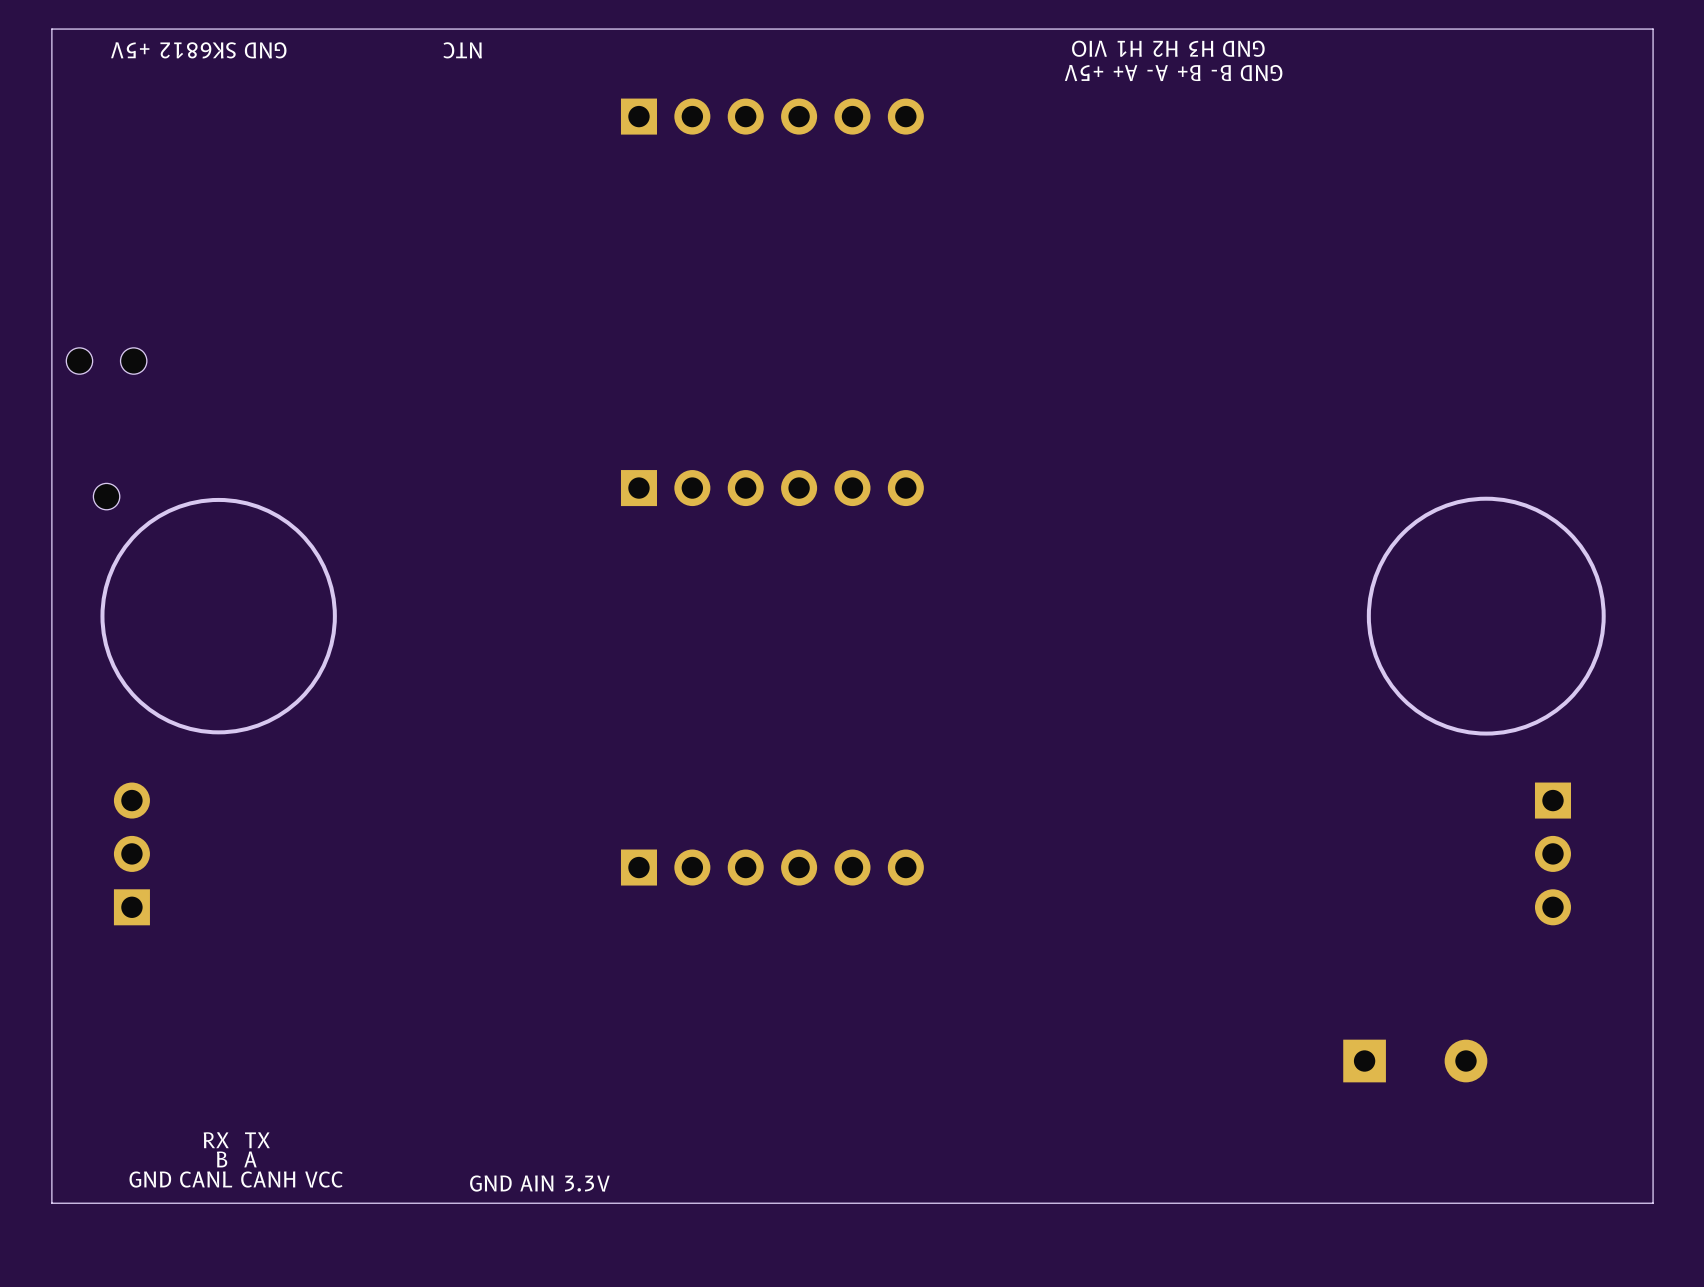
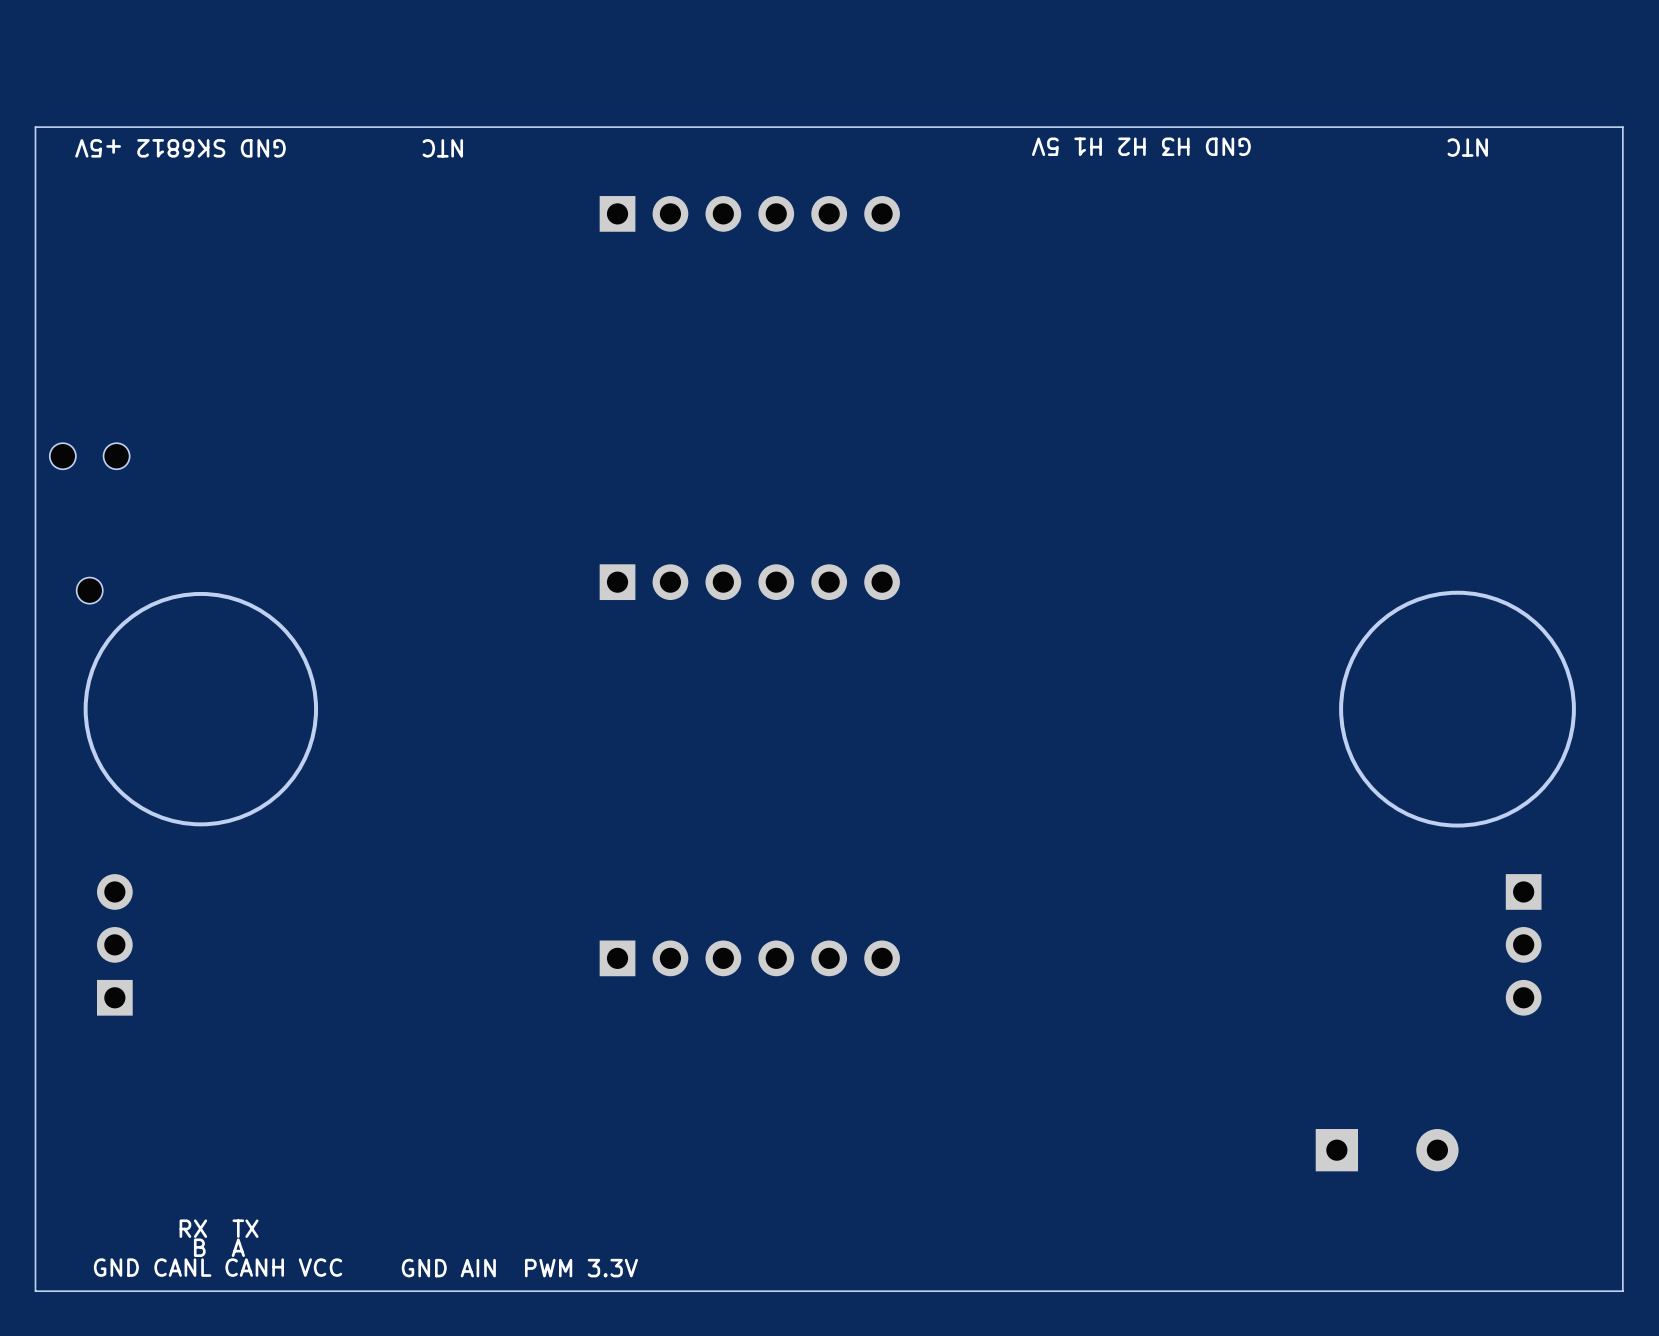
text: GND H3 H2 H1 VIO (1168, 48) -> GND H3 H2 H1 5V (1141, 146)
text: none -> NTC (1467, 147)
text: GND B- B+ A- A+ +5V (1173, 73) -> none
text: GND AIN 3.3V (539, 1183) -> GND AIN PWM 3.3V (519, 1268)

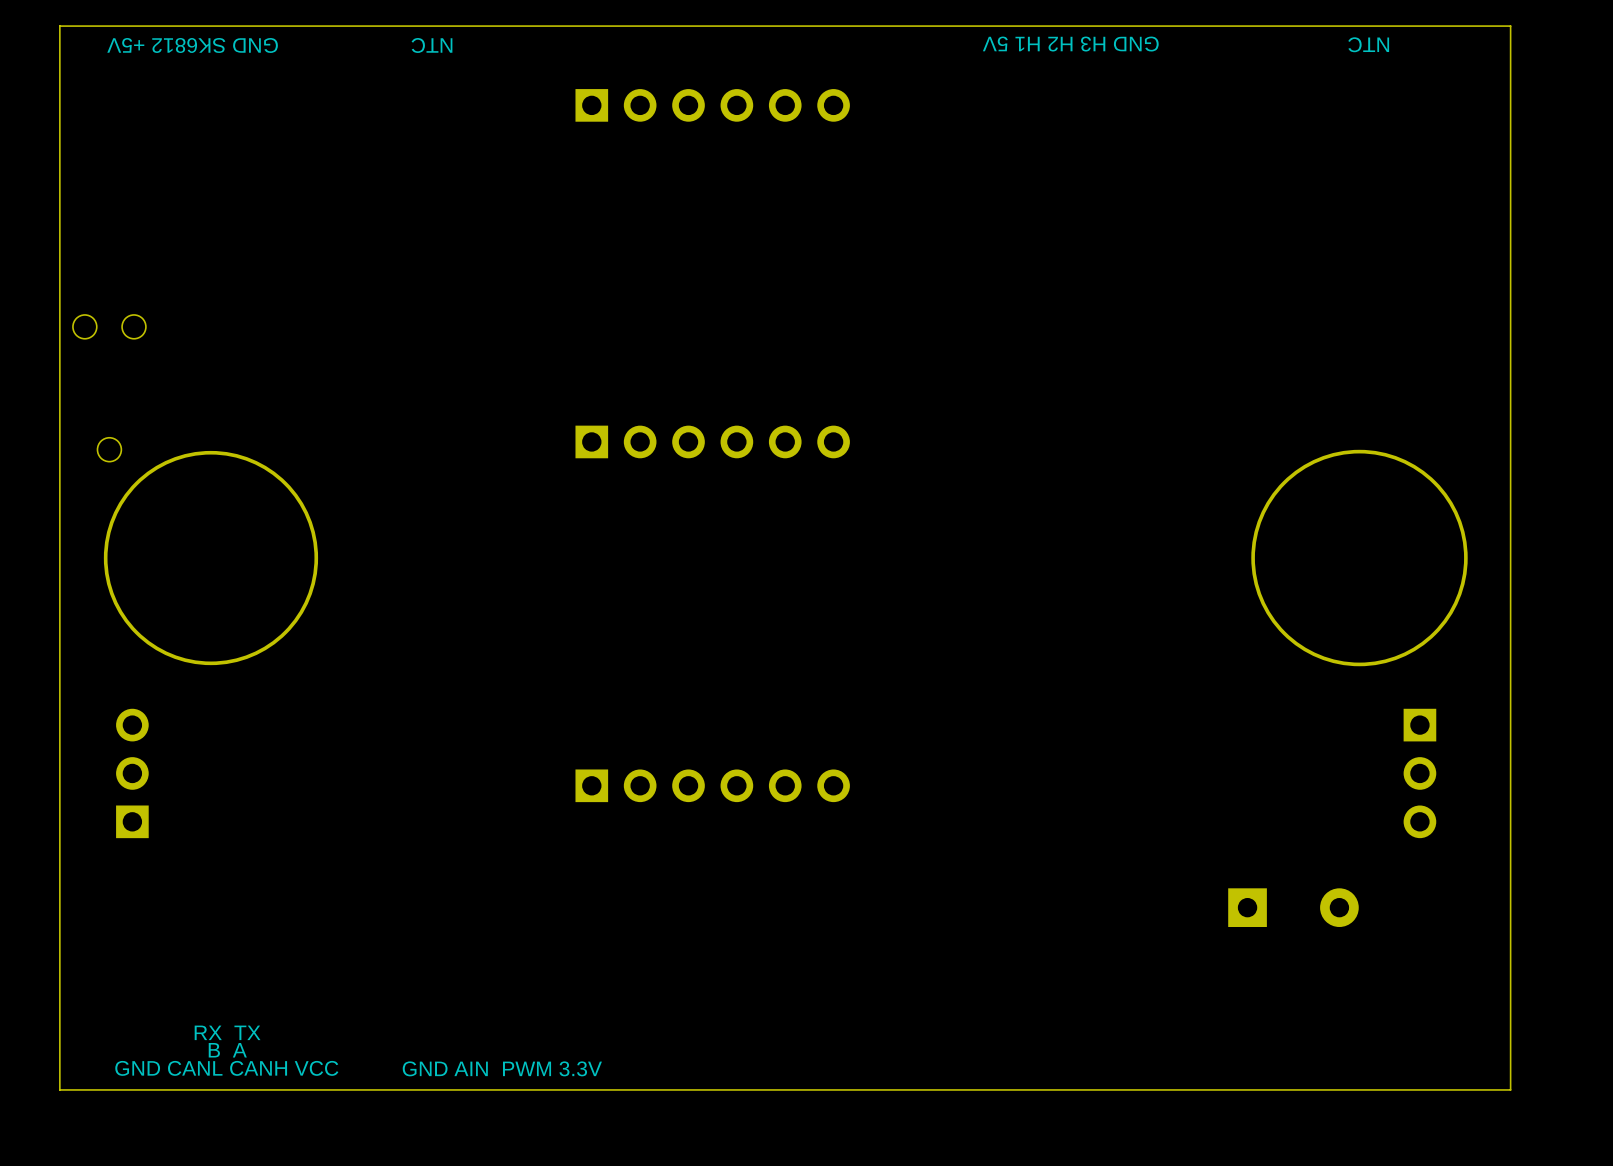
part position: (1387, 1150) -> (1293, 907)

